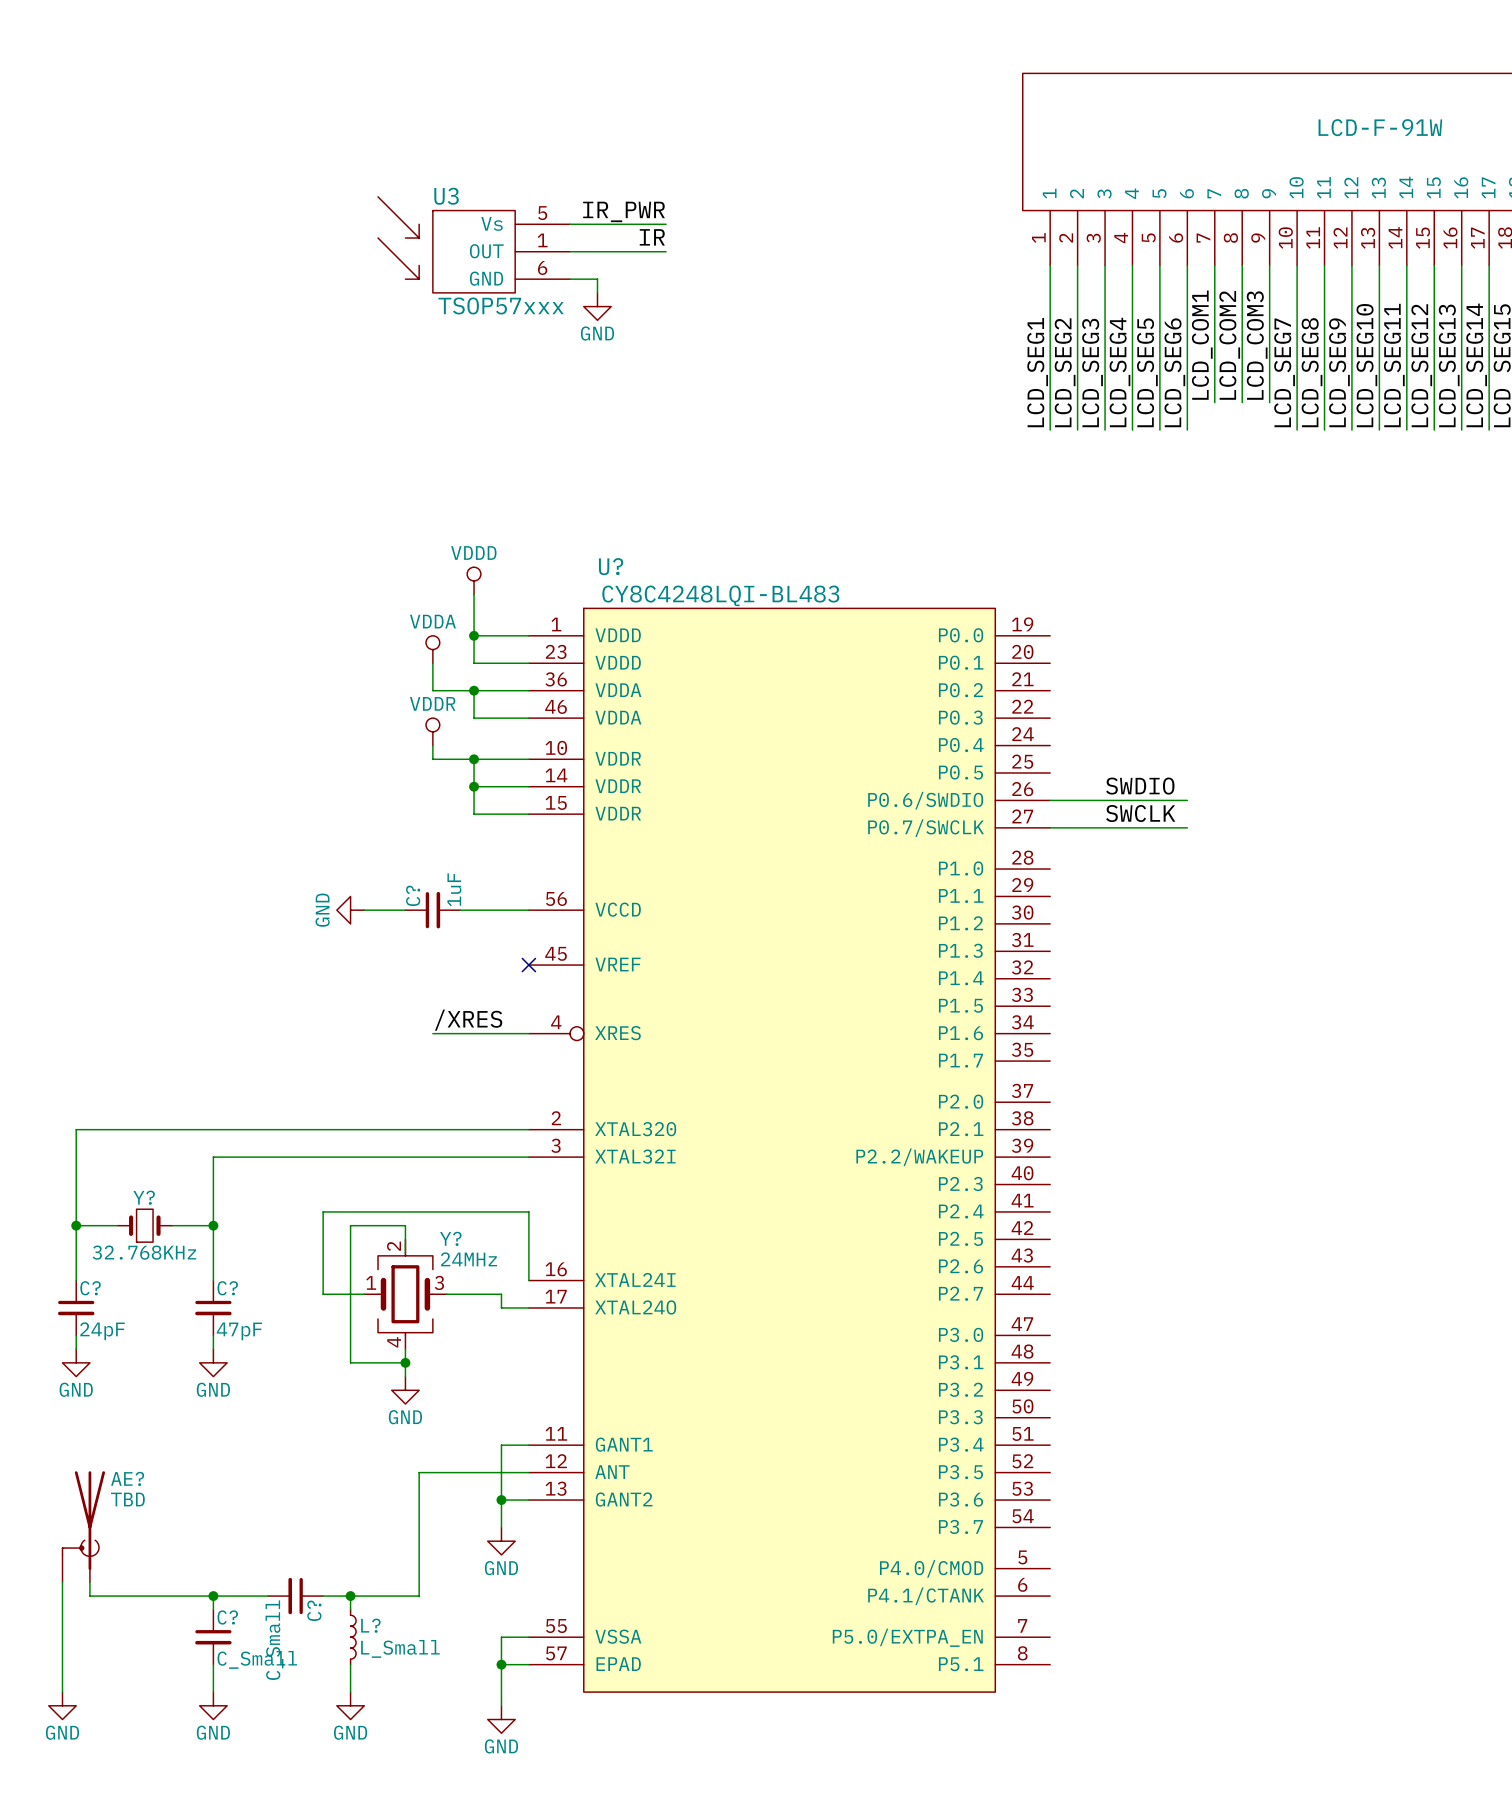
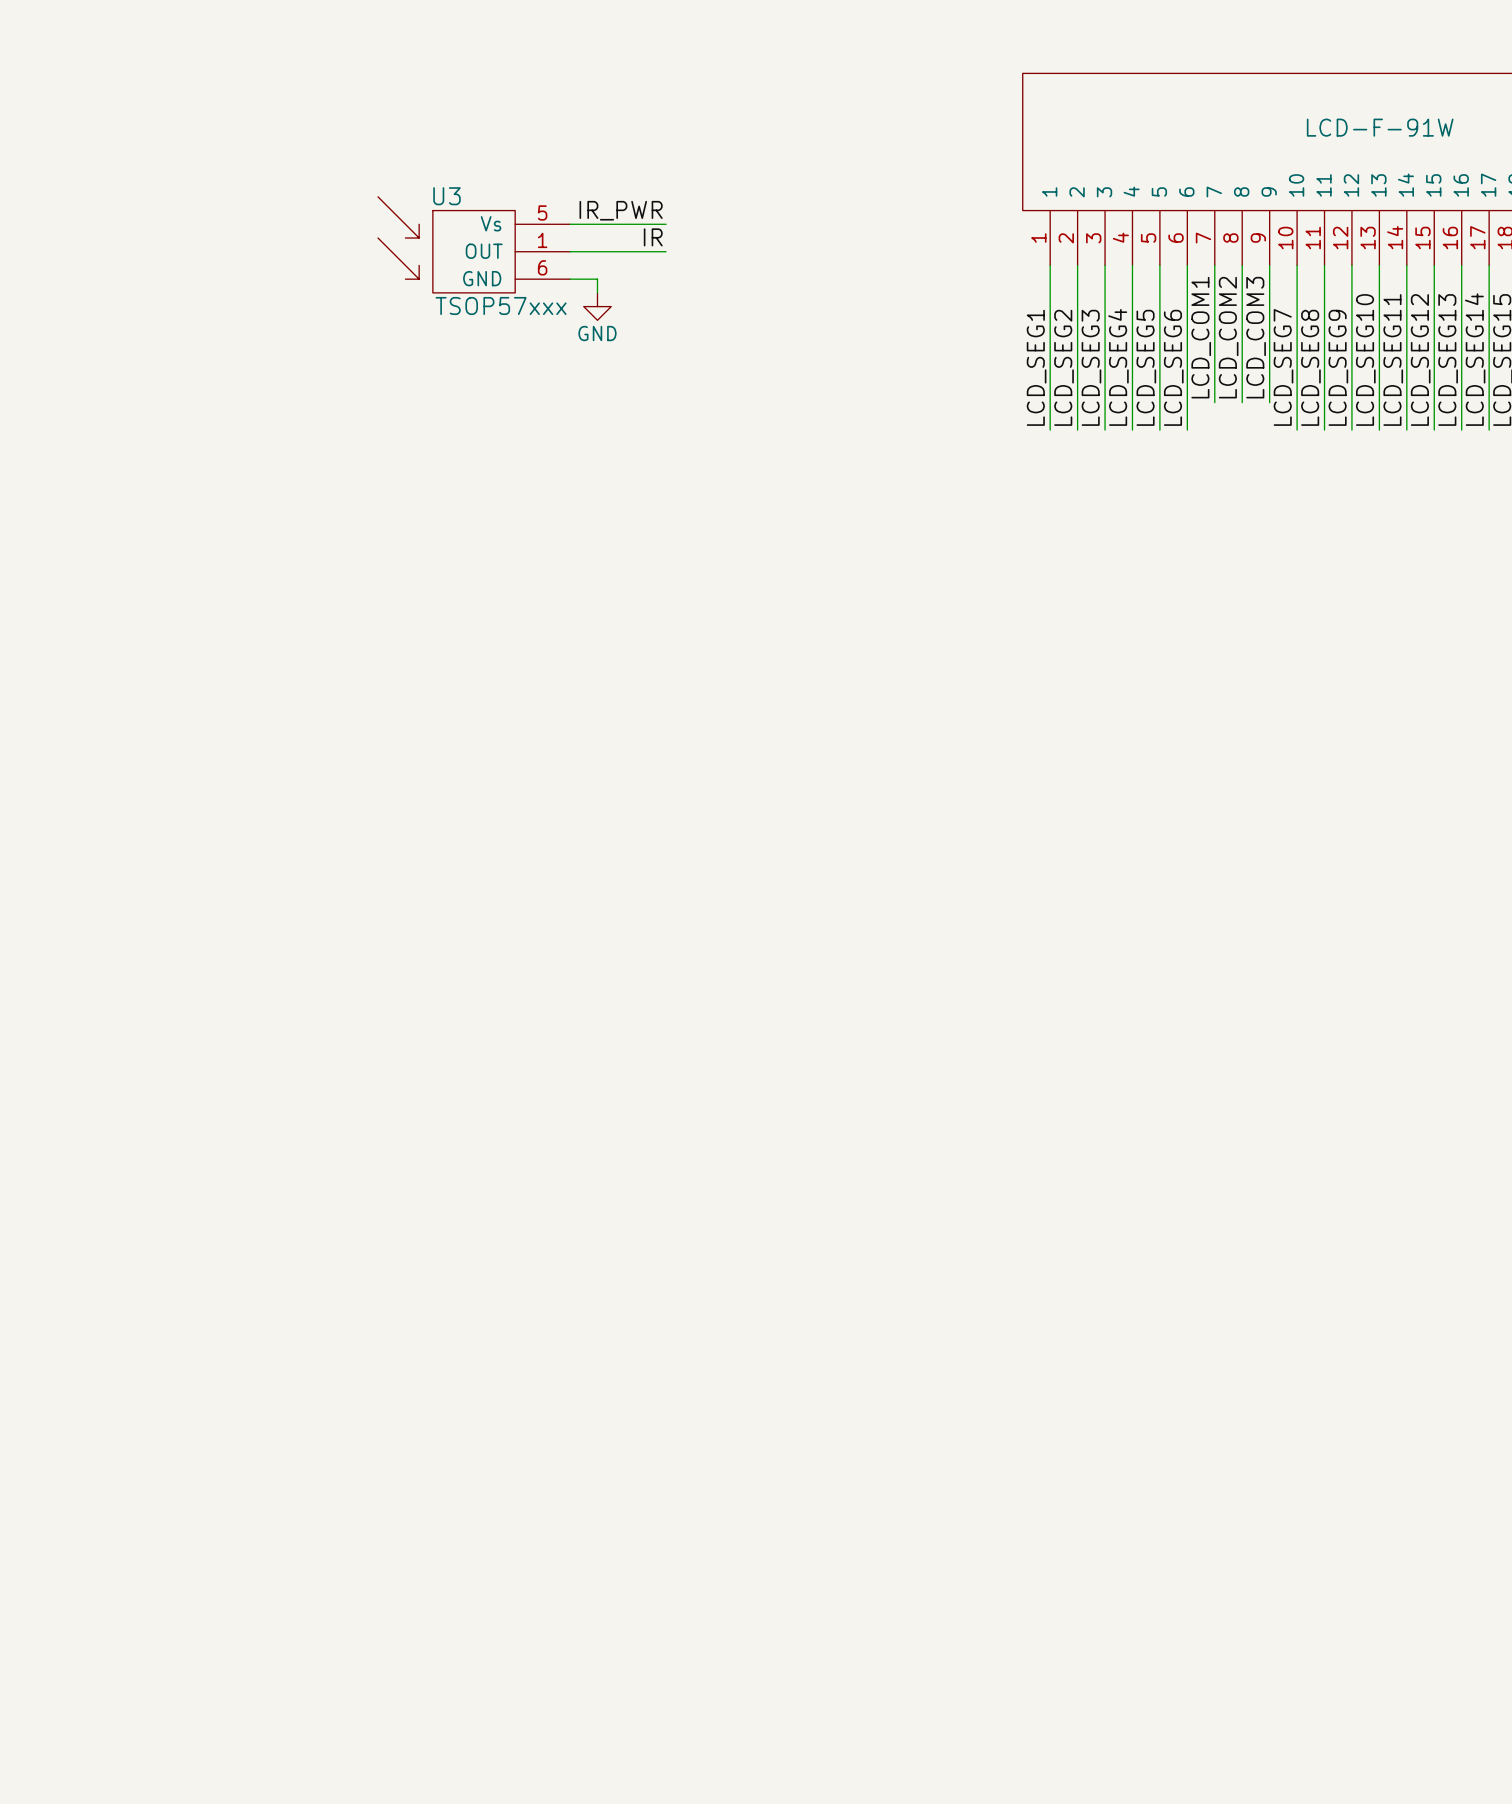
power symbol: VDDD (474, 580) -> none
wire: (474, 594) (474, 663) (528, 663) -> none
wire: (474, 635) (528, 635) -> none
junction: (474, 635) -> none
power symbol: VDDA (432, 649) -> none
wire: (432, 663) (432, 690) (528, 690) -> none
wire: (474, 690) (474, 718) (528, 718) -> none
junction: (474, 690) -> none
power symbol: VDDR (432, 731) -> none
wire: (432, 745) (432, 759) (528, 759) -> none
wire: (474, 759) (474, 814) (528, 814) -> none
junction: (474, 759) -> none
wire: (474, 786) (528, 786) -> none
junction: (474, 786) -> none
label: SWDIO (1140, 786) -> none
wire: (1050, 800) (1187, 800) -> none
label: SWCLK (1140, 813) -> none
wire: (1050, 827) (1187, 827) -> none
power symbol: GND (350, 910) -> none
wire: (364, 910) (405, 910) -> none
C?: 1uF (432, 910) -> none
wire: (460, 910) (528, 910) -> none
no-connect mark: (528, 965) -> none
label: /XRES (468, 1020) -> none
wire: (432, 1033) (528, 1033) -> none
wire: (528, 1129) (76, 1129) (76, 1280) -> none
U?: CY8C4248LQI-BL483 (789, 1150) -> none
wire: (528, 1157) (213, 1157) (213, 1280) -> none
wire: (76, 1225) (117, 1225) -> none
junction: (76, 1225) -> none
Y?: 32.768KHz (144, 1225) -> none
wire: (172, 1225) (213, 1225) -> none
junction: (213, 1225) -> none
wire: (405, 1253) (405, 1225) (350, 1225) (350, 1362) (405, 1362) -> none
wire: (528, 1280) (528, 1211) (323, 1211) (323, 1294) (364, 1294) -> none
Y?: 24MHz (405, 1294) -> none
wire: (446, 1294) (501, 1294) (501, 1307) (528, 1307) -> none
C?: 24pF (76, 1307) -> none
C?: 47pF (213, 1307) -> none
wire: (76, 1335) (76, 1349) -> none
wire: (213, 1335) (213, 1349) -> none
wire: (405, 1349) (405, 1376) -> none
power symbol: GND (76, 1362) -> none
power symbol: GND (213, 1362) -> none
junction: (405, 1362) -> none
power symbol: GND (405, 1390) -> none
wire: (528, 1445) (501, 1445) (501, 1527) -> none
wire: (528, 1472) (419, 1472) (419, 1596) (323, 1596) -> none
wire: (501, 1500) (528, 1500) -> none
junction: (501, 1500) -> none
AE?: TBD (83, 1526) -> none
power symbol: GND (501, 1541) -> none
wire: (62, 1582) (62, 1692) -> none
wire: (89, 1582) (89, 1596) (268, 1596) -> none
wire: (213, 1596) (213, 1609) -> none
junction: (213, 1596) -> none
C?: C_Small (295, 1596) -> none
wire: (350, 1596) (350, 1609) -> none
junction: (350, 1596) -> none
C?: C_Small (213, 1637) -> none
L?: L_Small (353, 1637) -> none
wire: (528, 1637) (501, 1637) (501, 1705) -> none
wire: (213, 1664) (213, 1692) -> none
wire: (350, 1664) (350, 1692) -> none
wire: (501, 1664) (528, 1664) -> none
junction: (501, 1664) -> none
power symbol: GND (62, 1705) -> none
power symbol: GND (213, 1705) -> none
power symbol: GND (350, 1705) -> none
power symbol: GND (501, 1719) -> none

